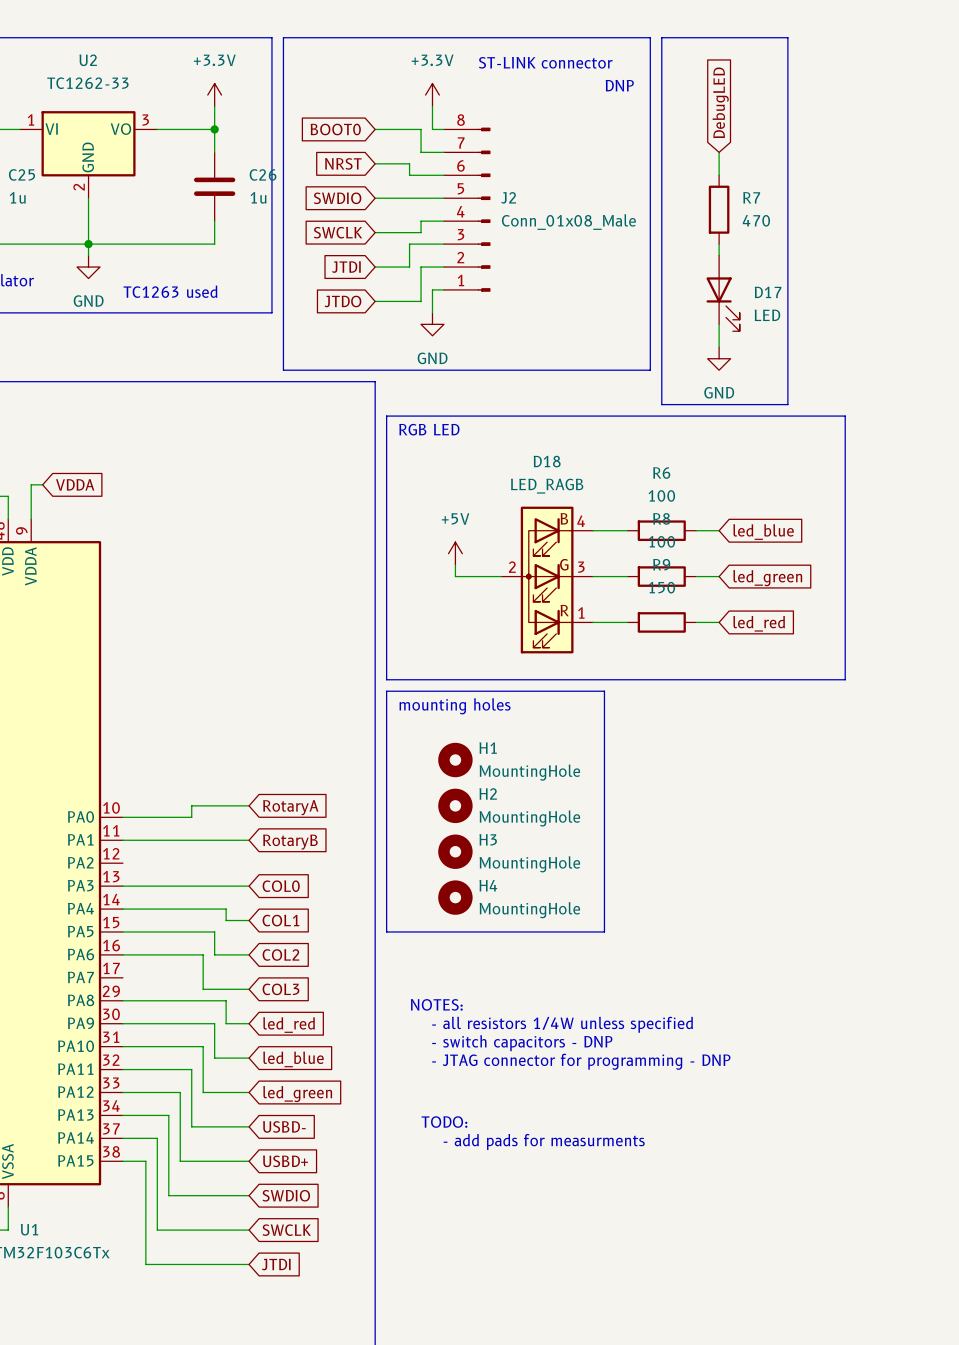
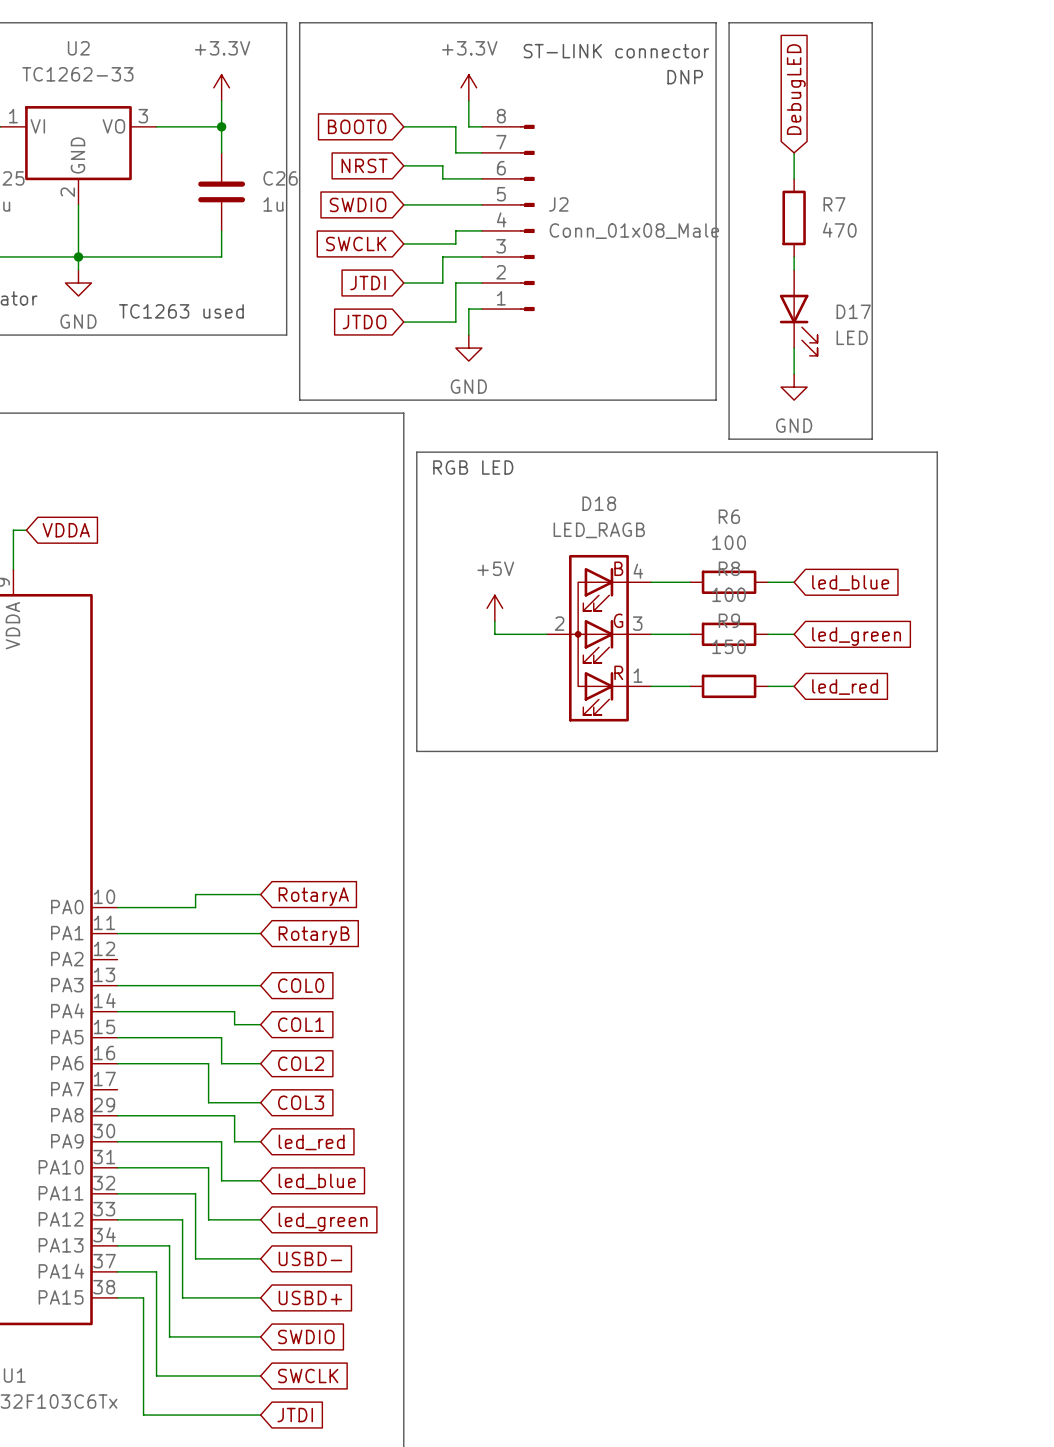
line: (386, 691) (604, 691) (604, 931) (386, 931) (386, 691) -> none
text: mounting holes (455, 706) -> none
H1: MountingHole (455, 760) -> none
H2: MountingHole (455, 805) -> none
H3: MountingHole (455, 851) -> none
H4: MountingHole (455, 897) -> none
text: NOTES: (436, 1004) -> none
text: - all resistors 1/4W unless specified (562, 1024) -> none
text: - switch capacitors - DNP (522, 1043) -> none
text: - JTAG connector for programming - DNP (581, 1061) -> none
text: TODO: (444, 1122) -> none
text: - add pads for measurments (544, 1141) -> none

